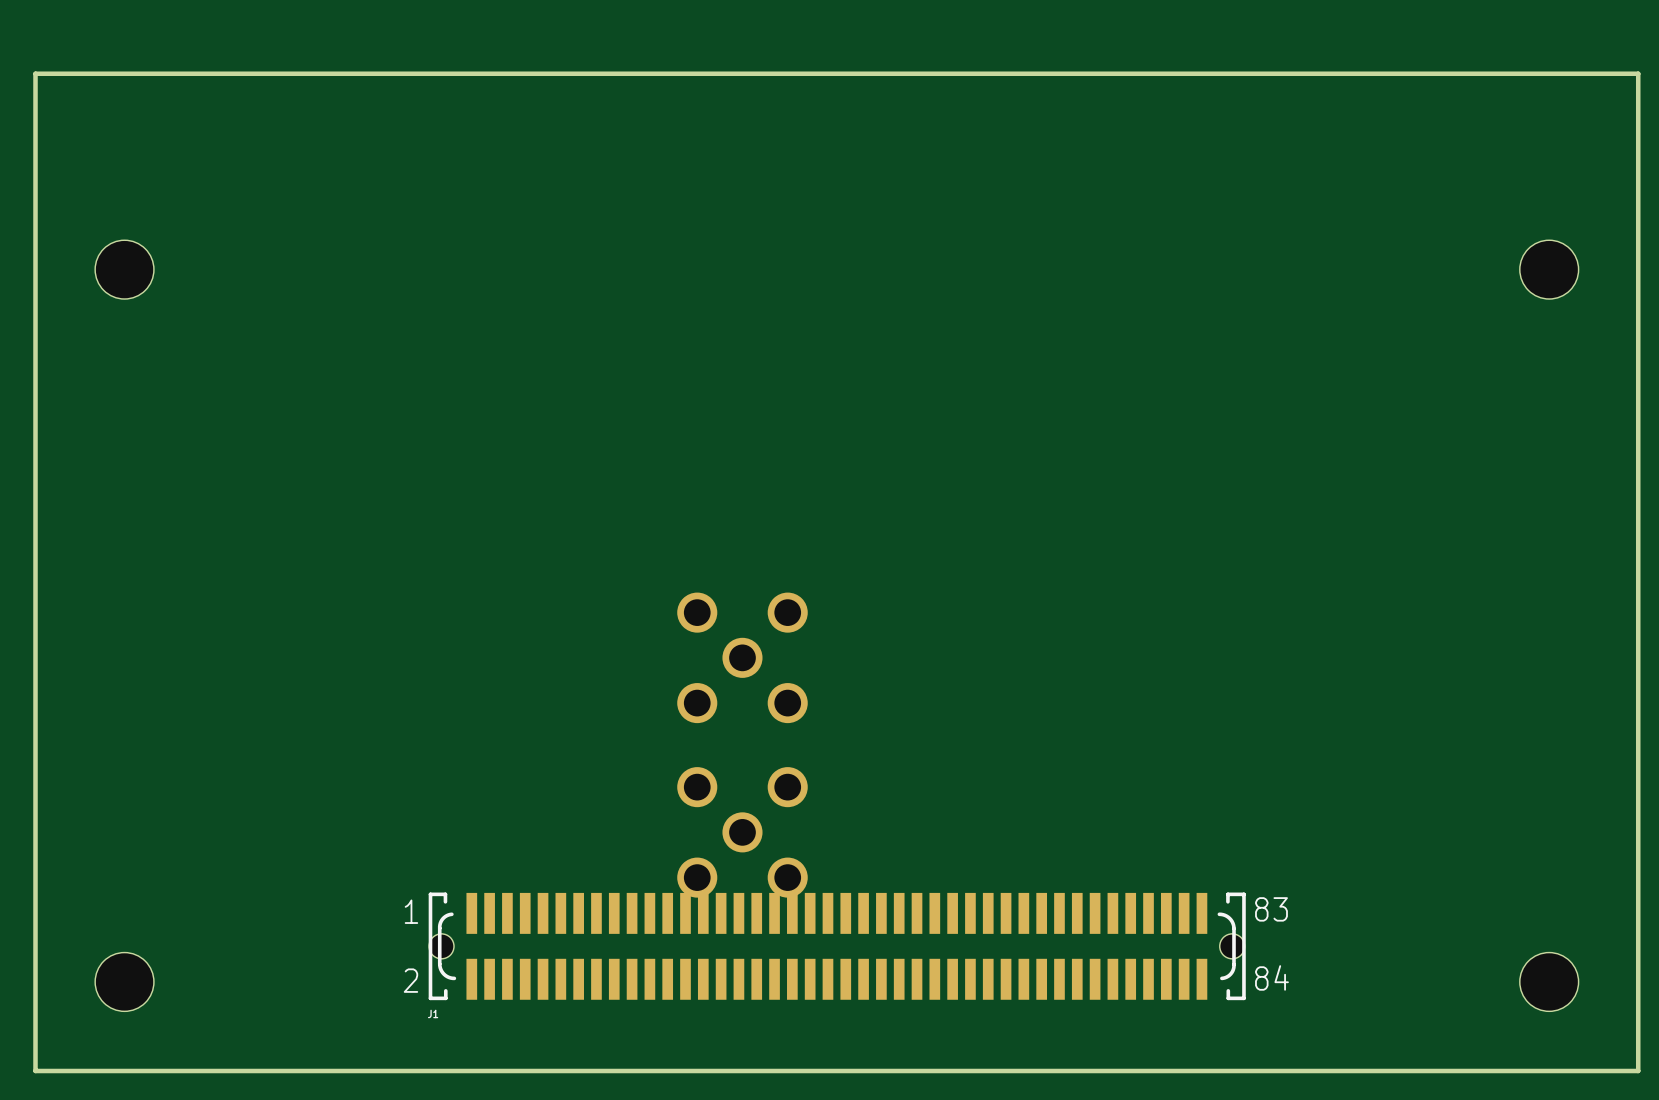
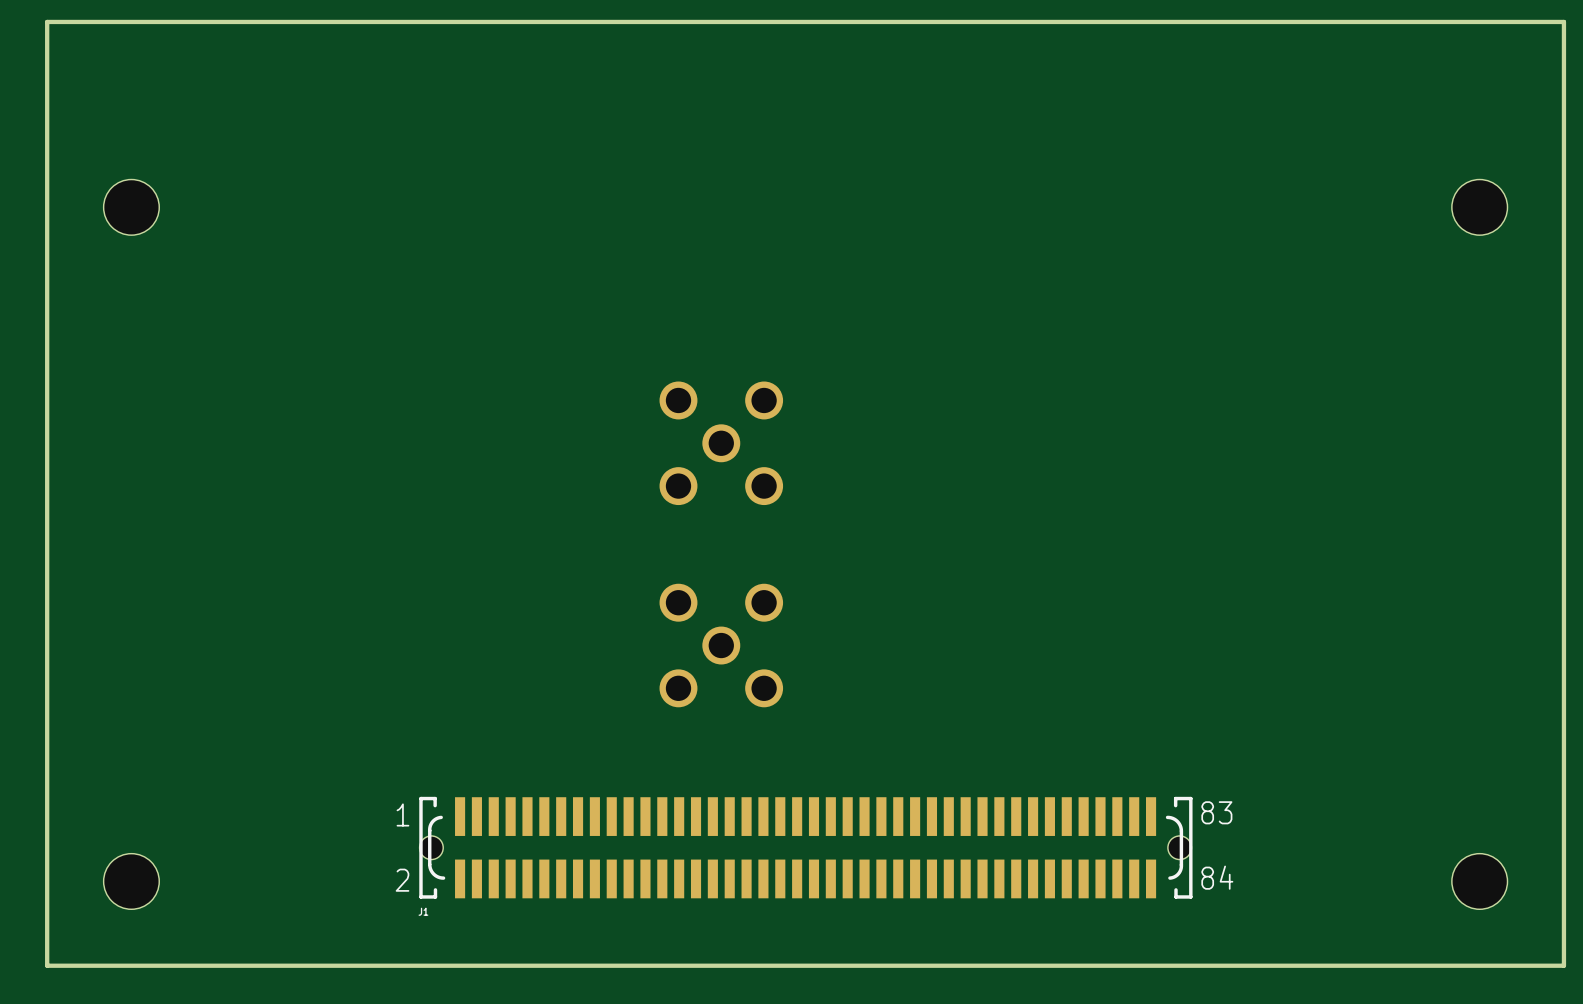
part: none -> (721, 443)
part: (742, 657) -> none
part: none -> (721, 645)
part: (742, 832) -> none

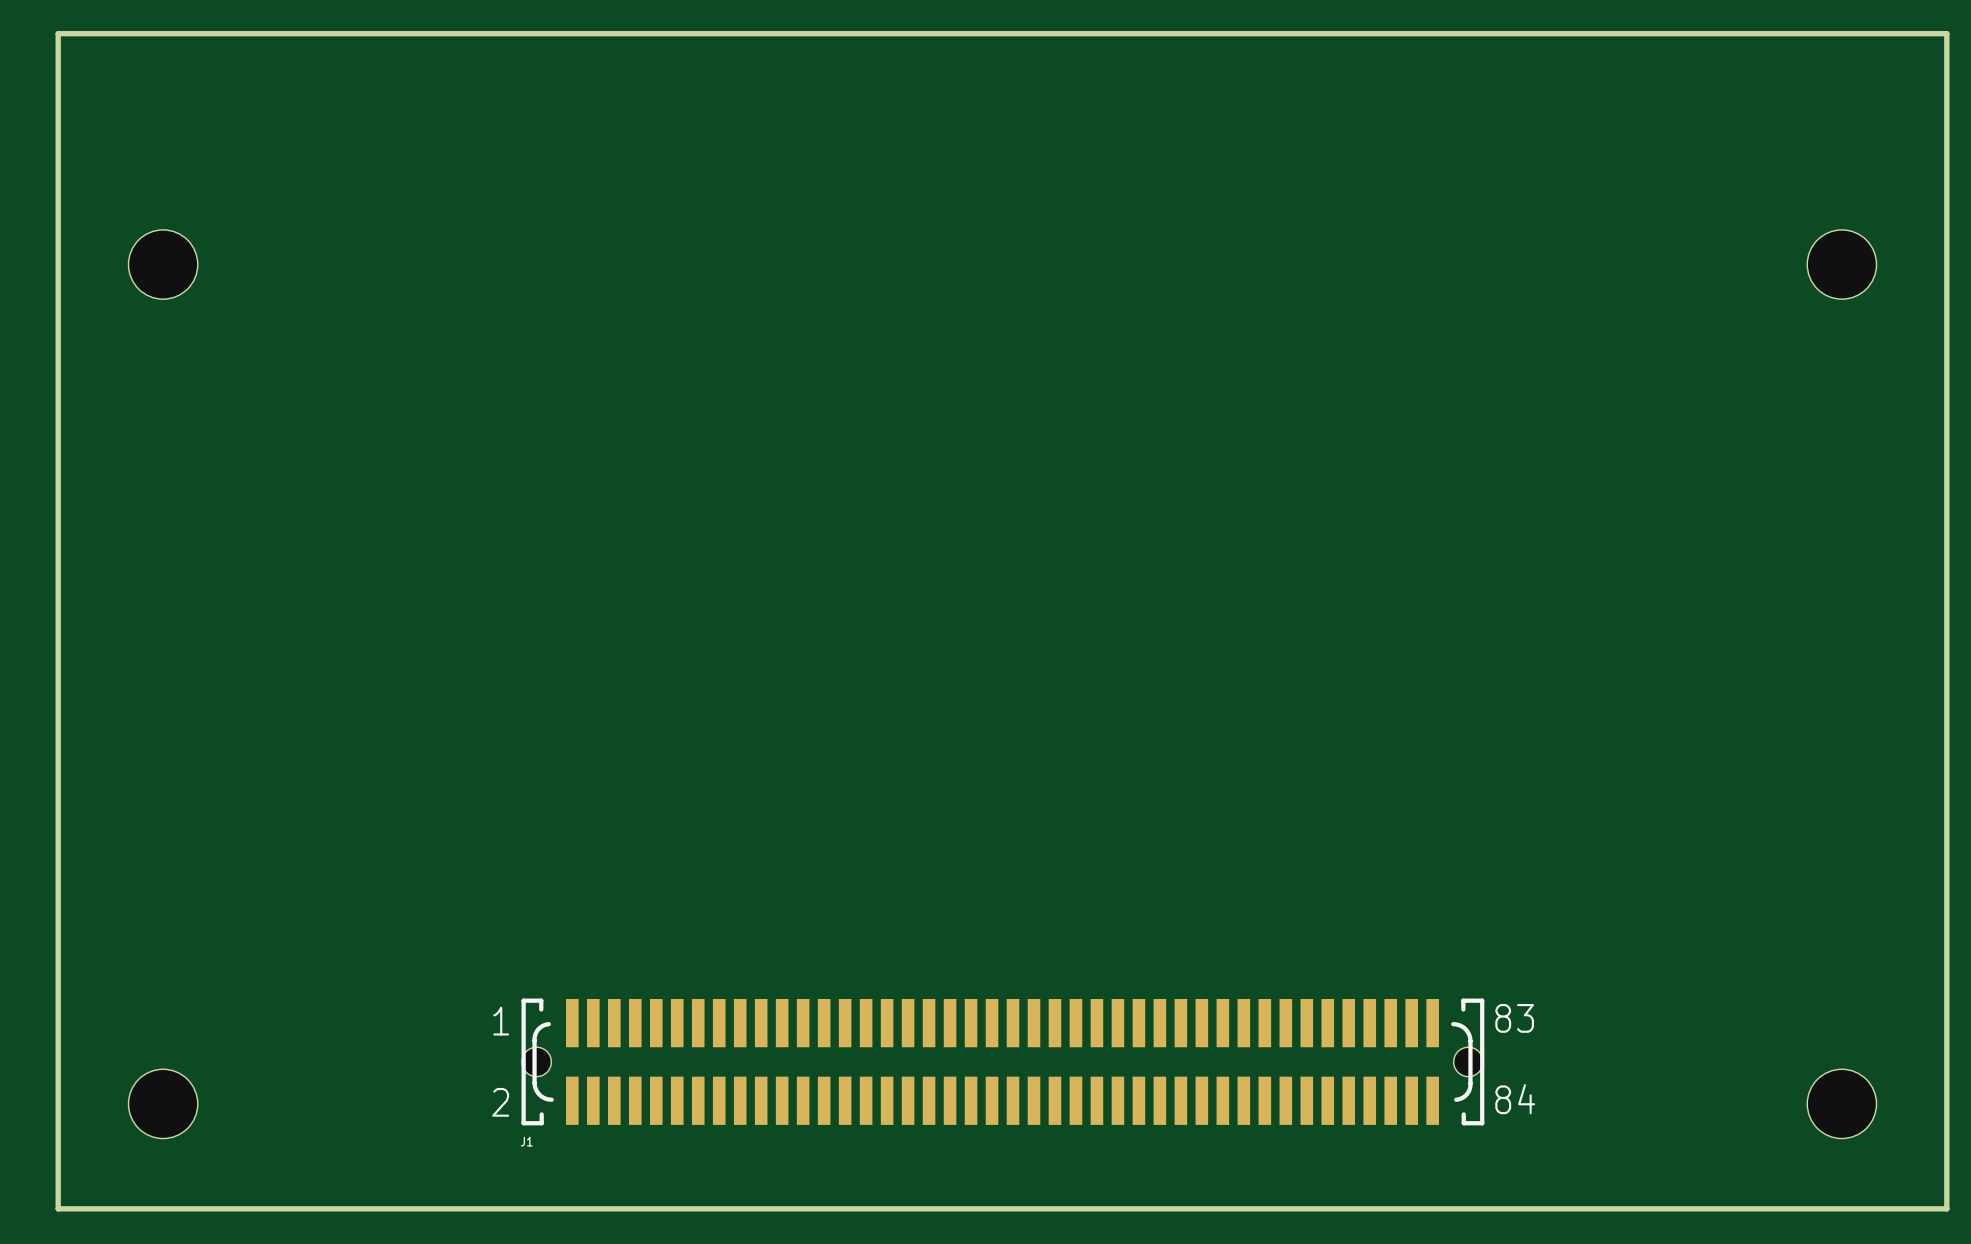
part: (721, 443) -> none
part: (721, 645) -> none

